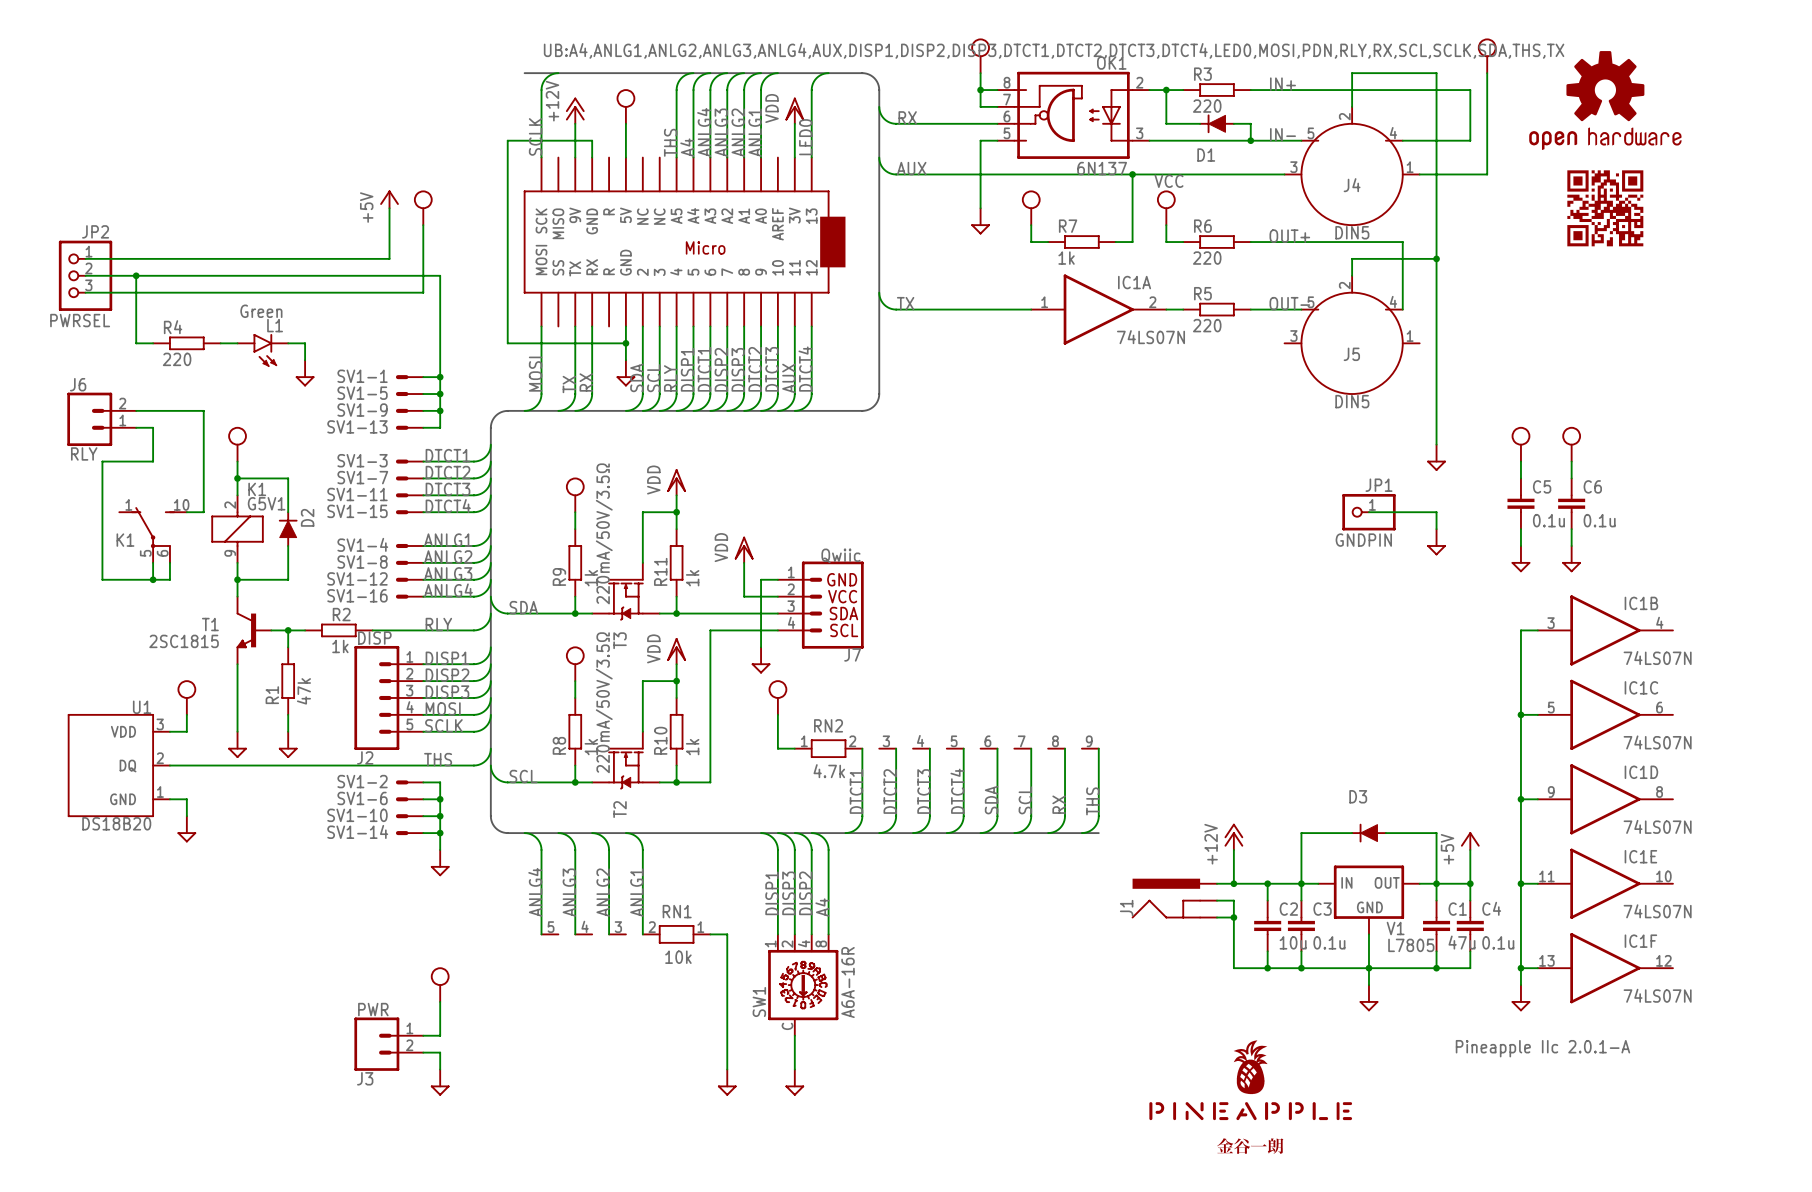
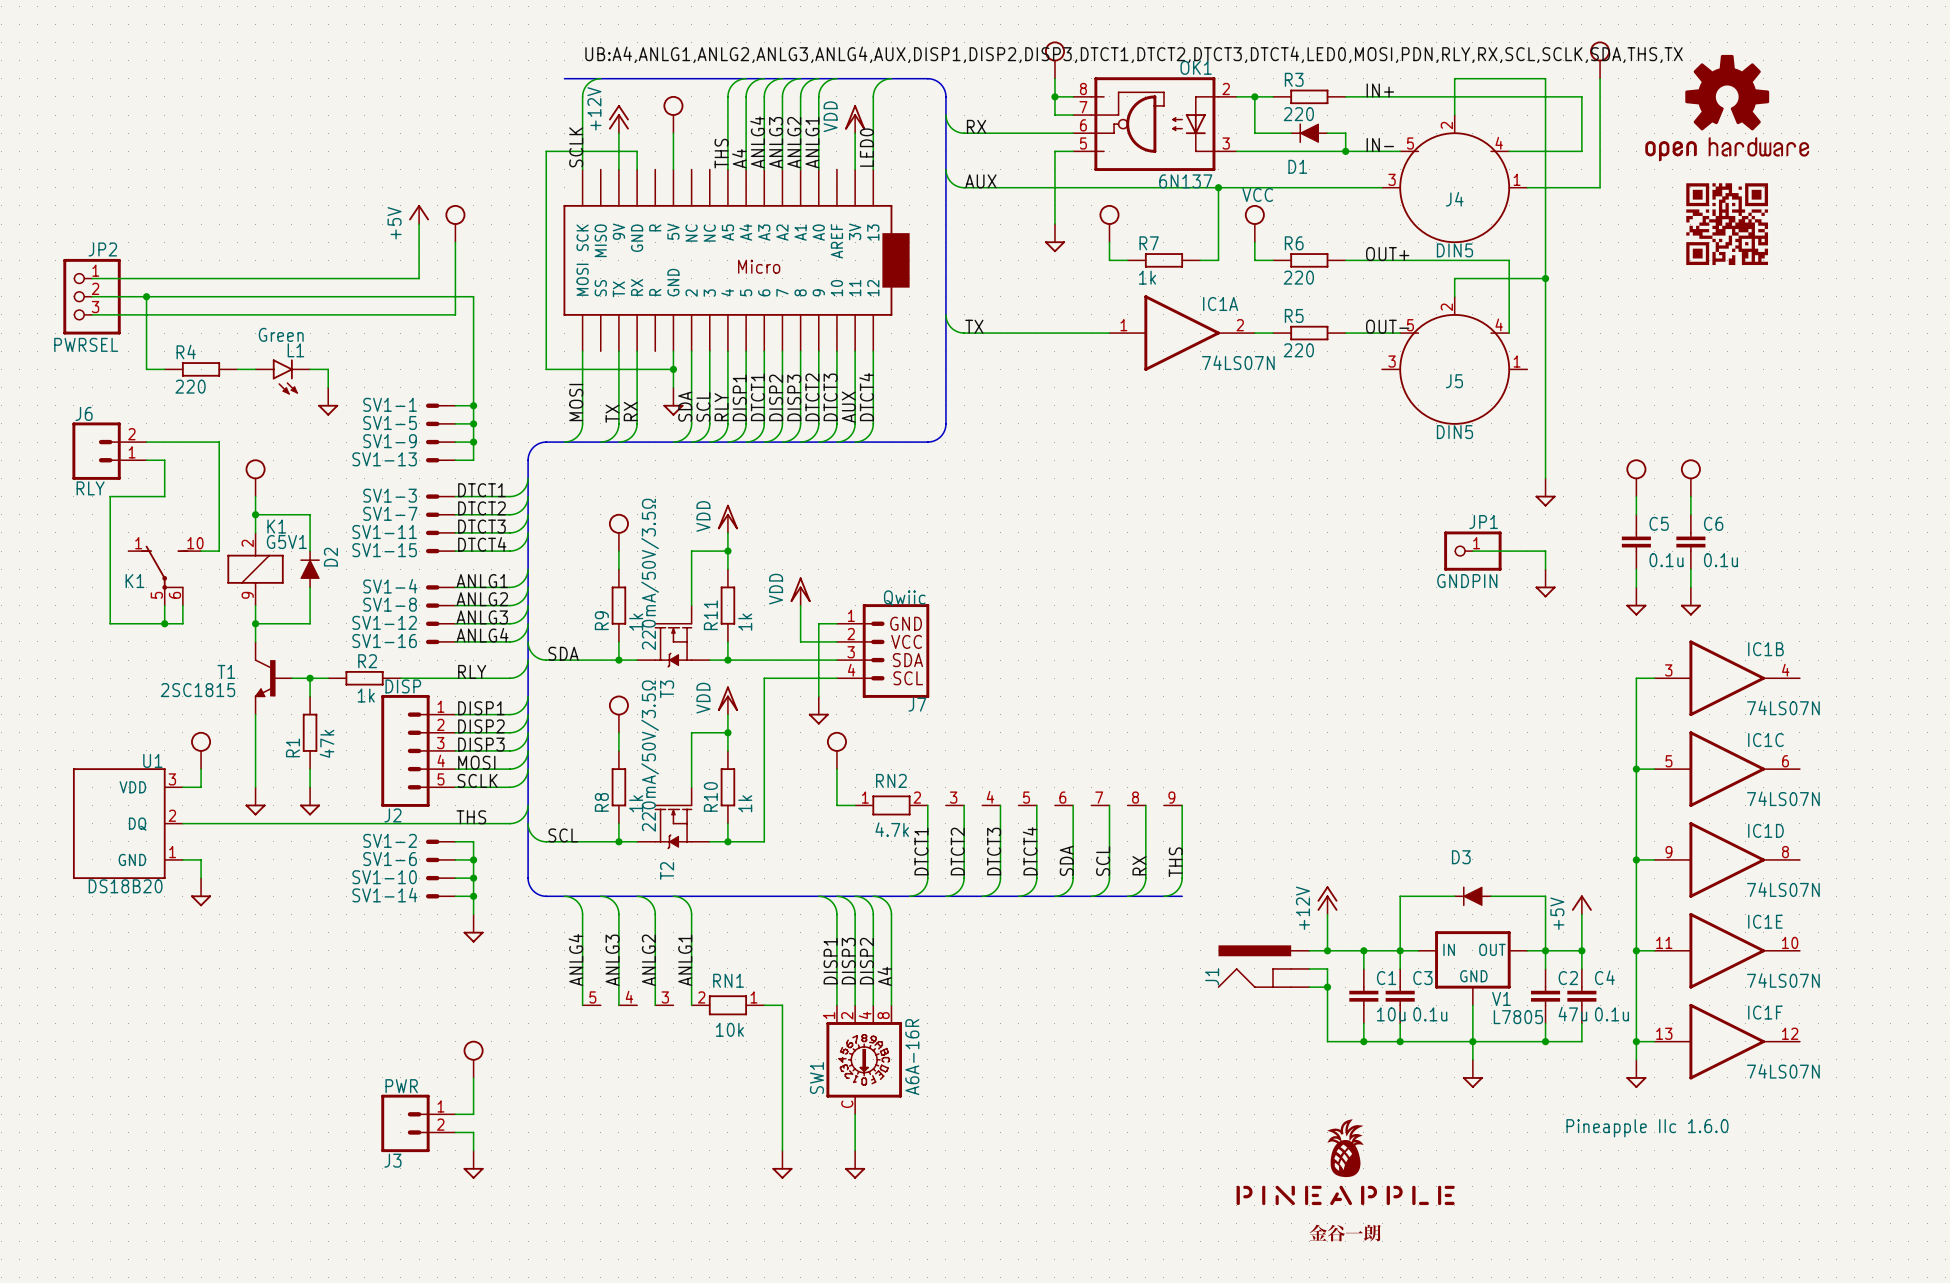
C2 name: C2 (1288, 909) -> C1 (1386, 978)
C1 name: C1 (1457, 909) -> C2 (1568, 978)
text: Pineapple IIc 2.0.1-A (1542, 1048) -> Pineapple IIc 1.6.0 (1647, 1128)

